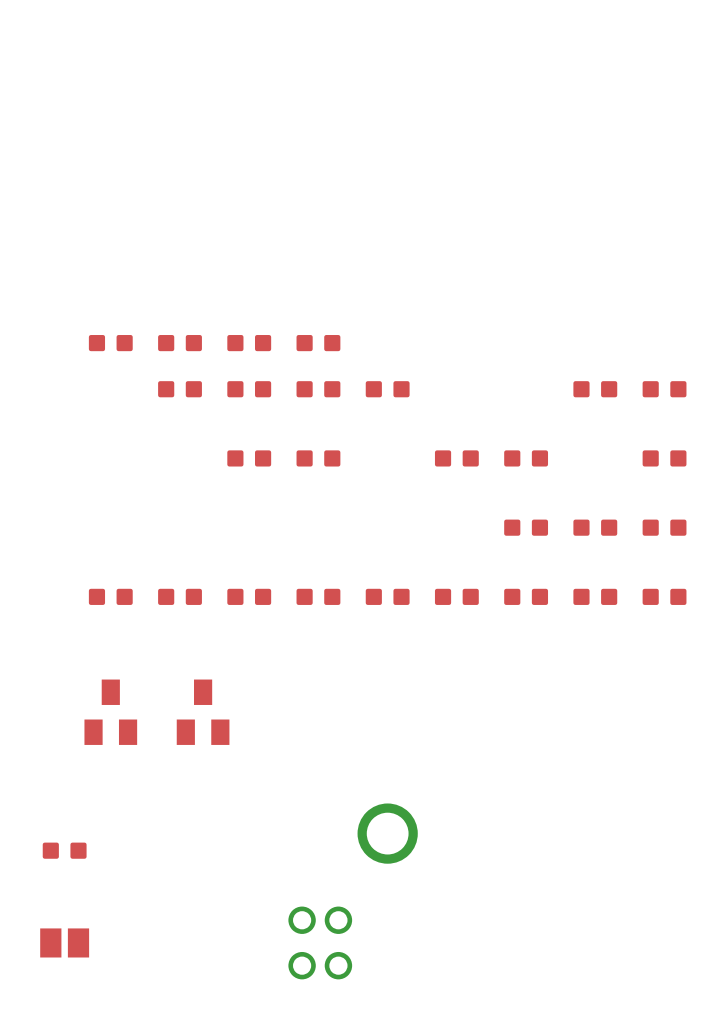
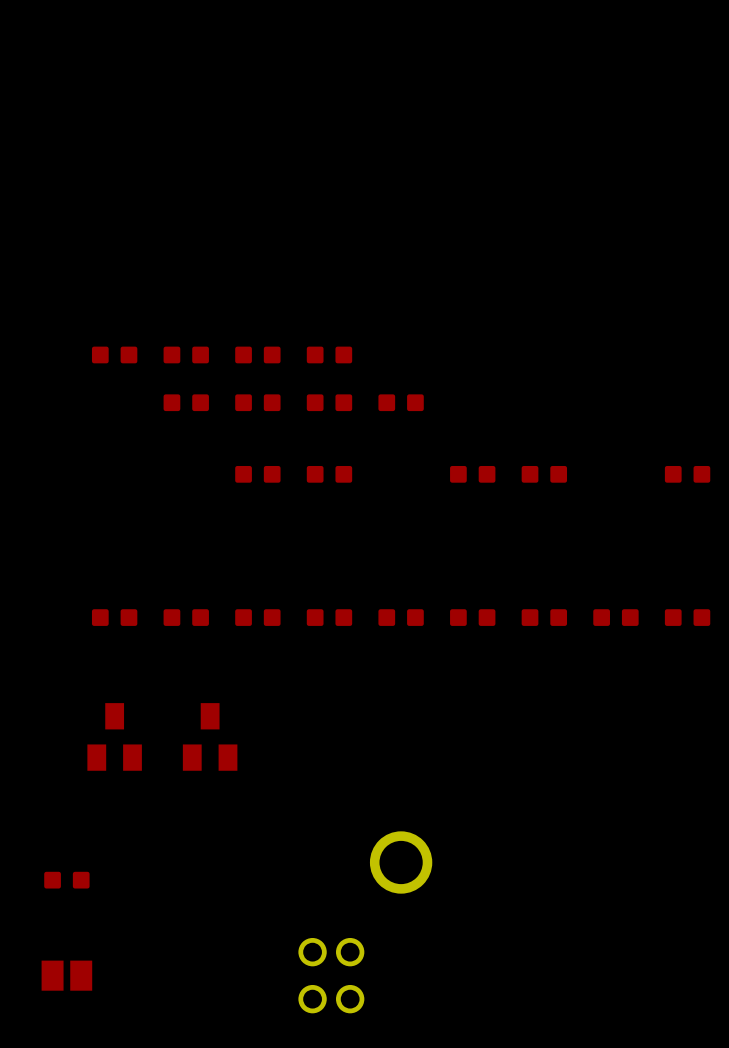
part: (595, 389) -> none
part: (664, 389) -> none
part: (526, 527) -> none
part: (595, 527) -> none
part: (664, 527) -> none

